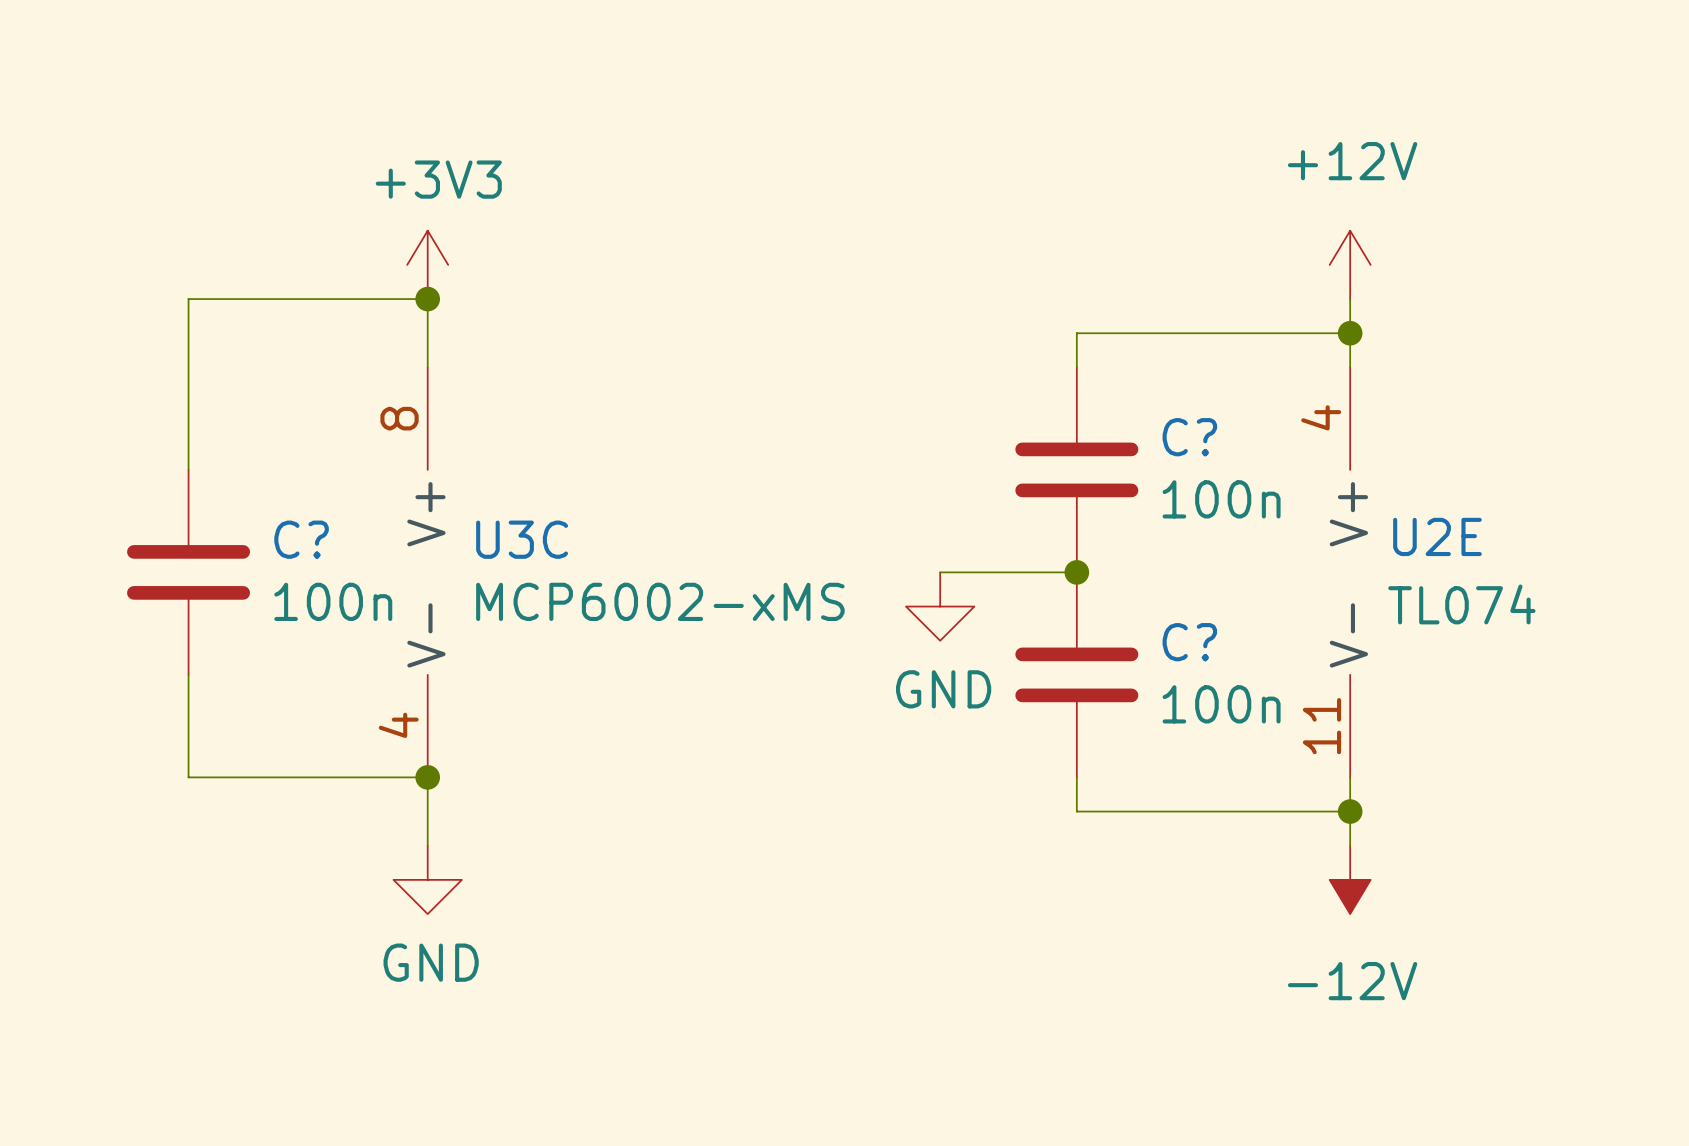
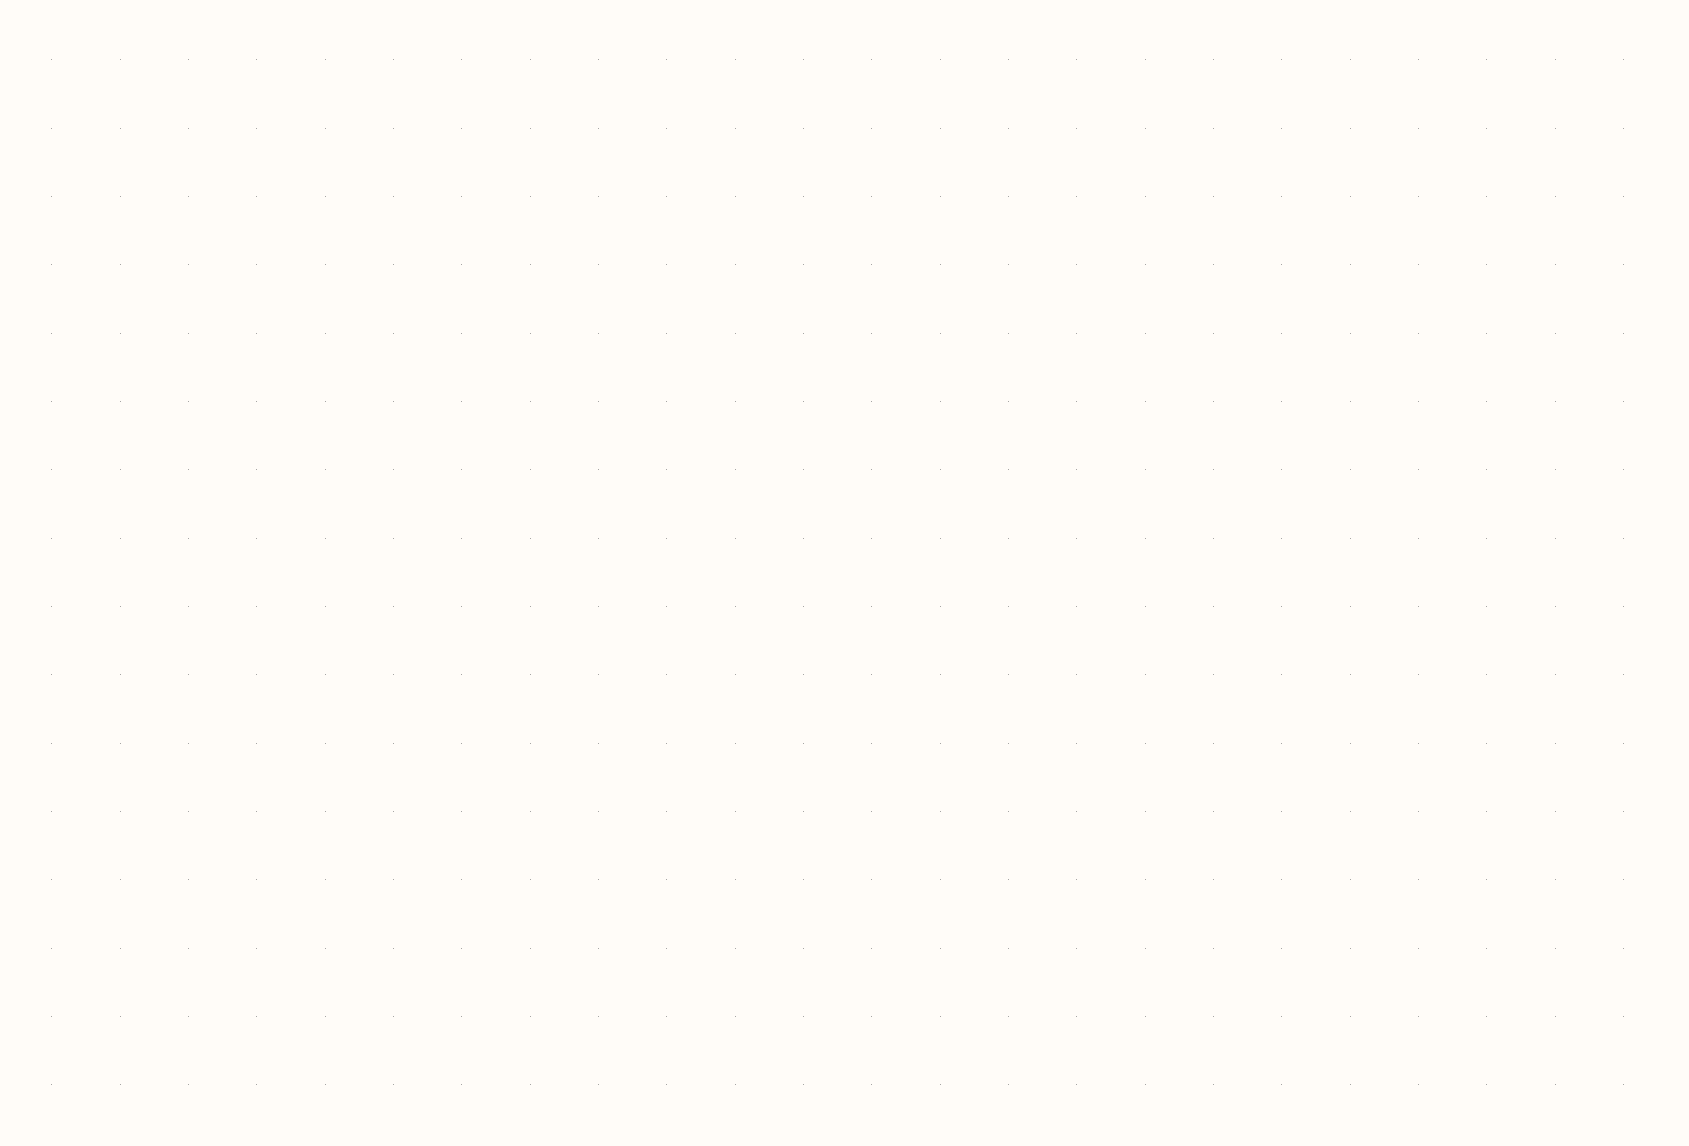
power symbol: +3V3 (427, 264) -> none
power symbol: +12V (1350, 264) -> none
junction: (427, 299) -> none
wire: (1350, 299) (1350, 367) -> none
wire: (1350, 333) (1076, 333) (1076, 367) -> none
junction: (1350, 333) -> none
wire: (427, 367) (427, 299) (188, 299) (188, 469) -> none
C?: 100n (1076, 469) -> none
C?: 100n (188, 572) -> none
U3C: MCP6002-xMS (427, 572) -> none
wire: (940, 572) (1076, 572) -> none
junction: (1076, 572) -> none
U2E: TL074 (1350, 572) -> none
power symbol: GND (940, 606) -> none
wire: (188, 674) (188, 777) (427, 777) (427, 845) -> none
C?: 100n (1076, 674) -> none
junction: (427, 777) -> none
wire: (1076, 777) (1076, 811) (1350, 811) -> none
wire: (1350, 777) (1350, 845) -> none
junction: (1350, 811) -> none
power symbol: GND (427, 879) -> none
power symbol: -12V (1350, 879) -> none

